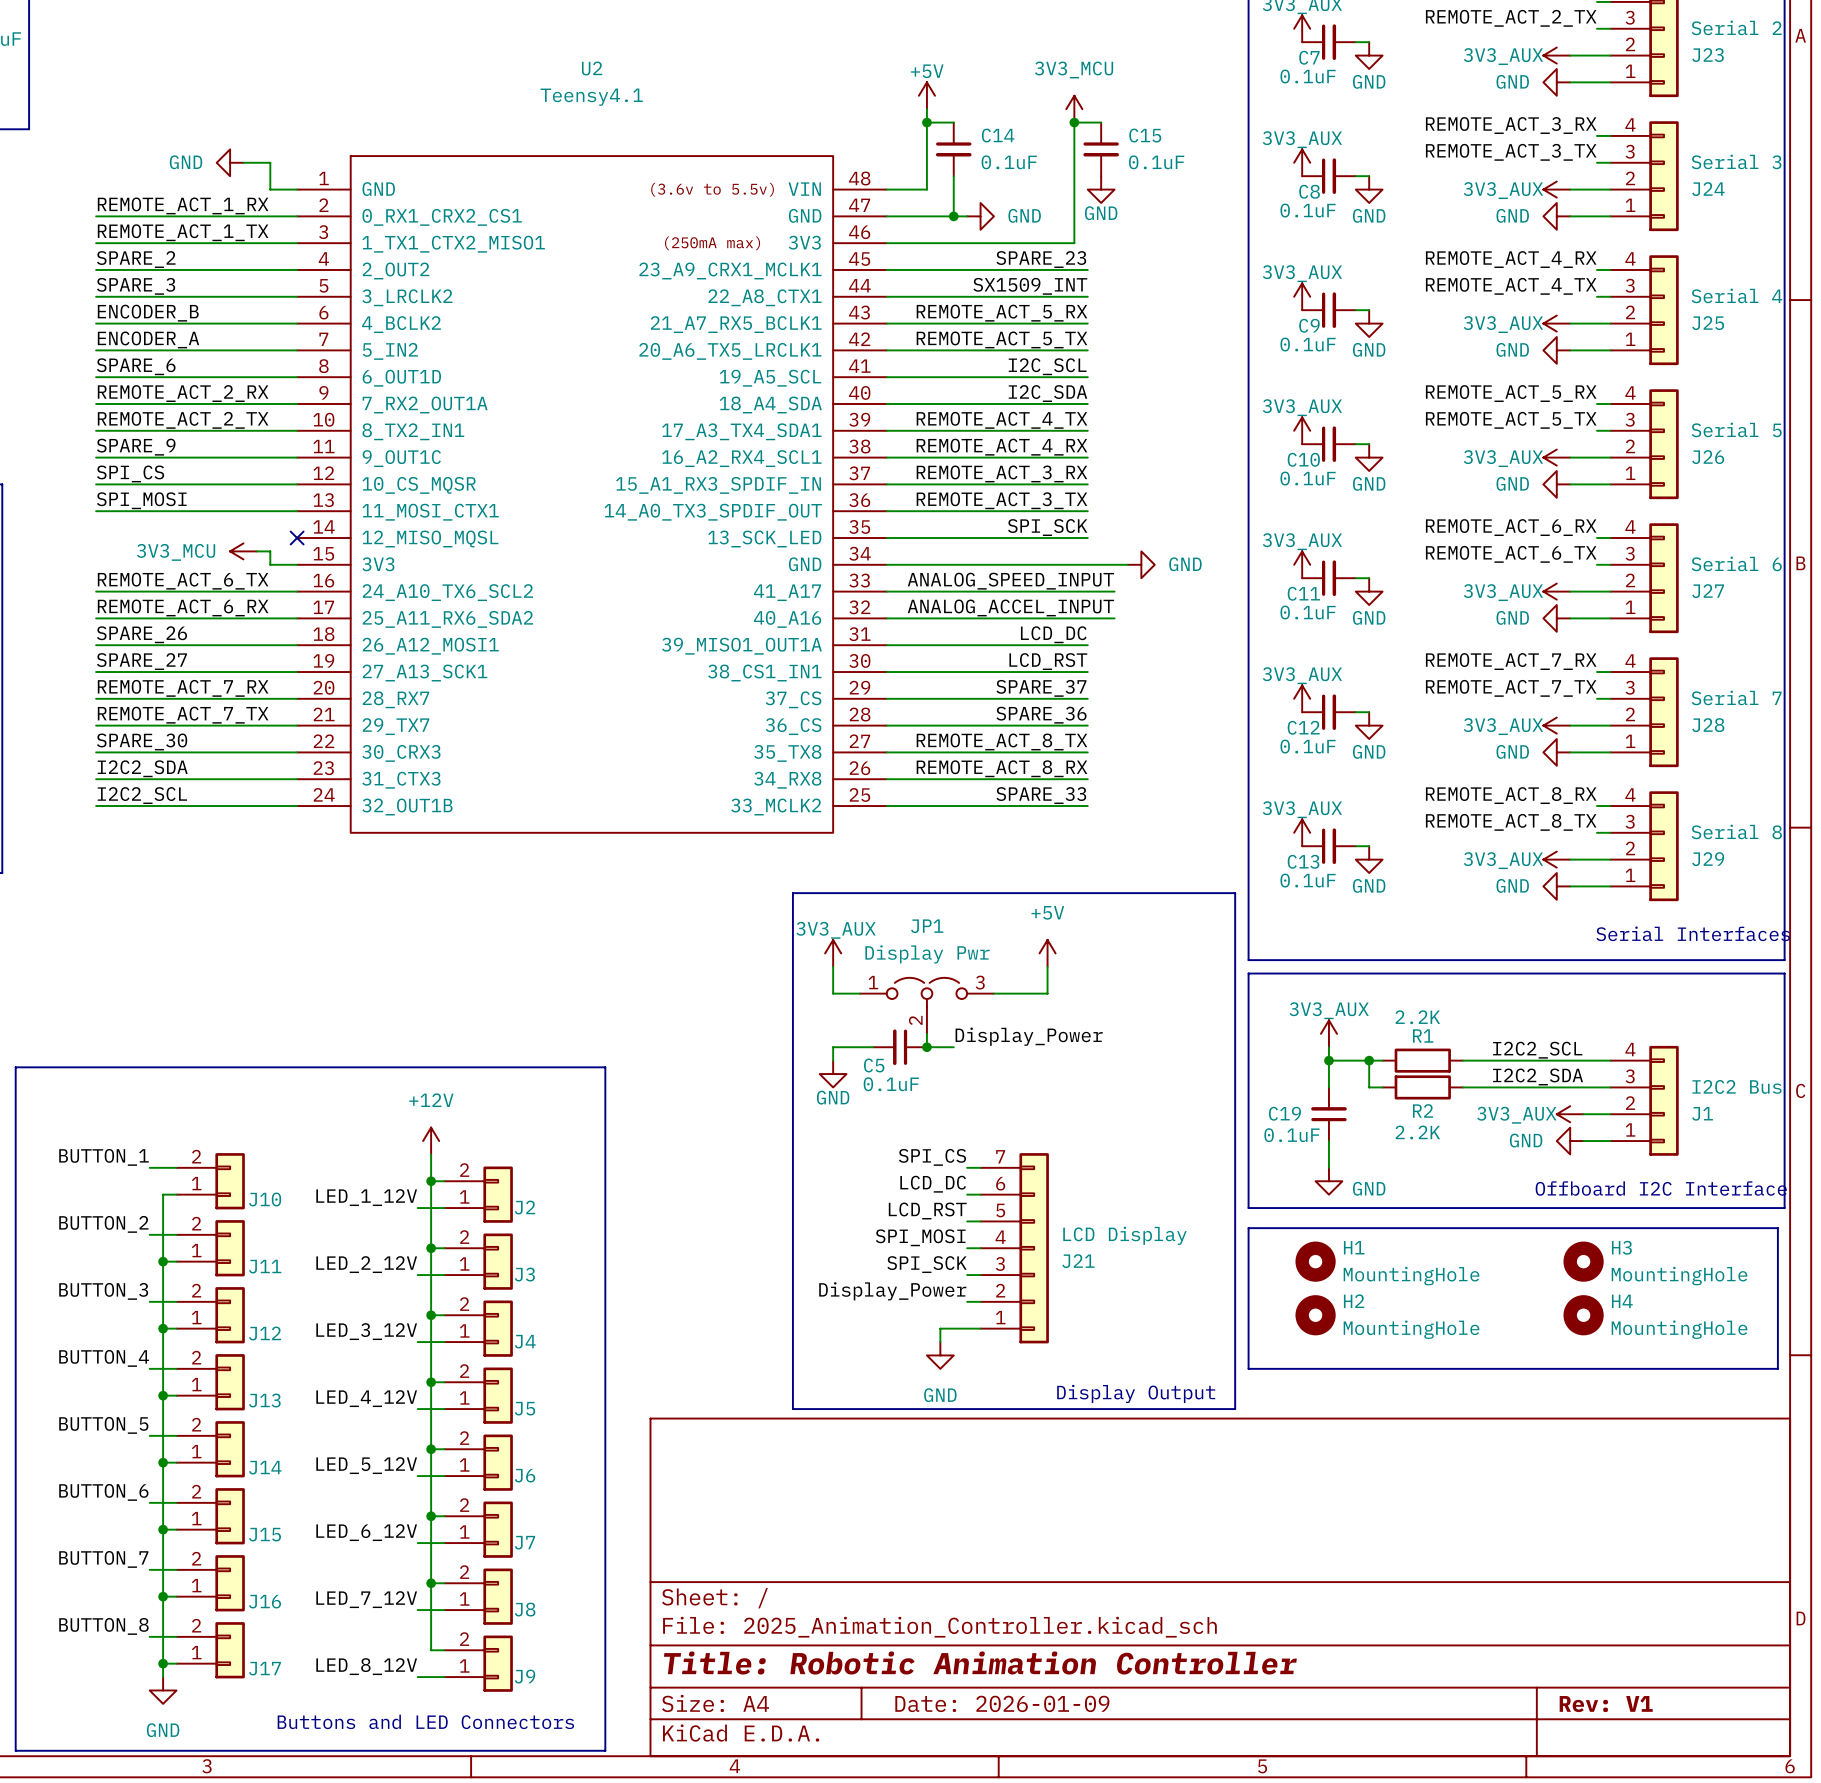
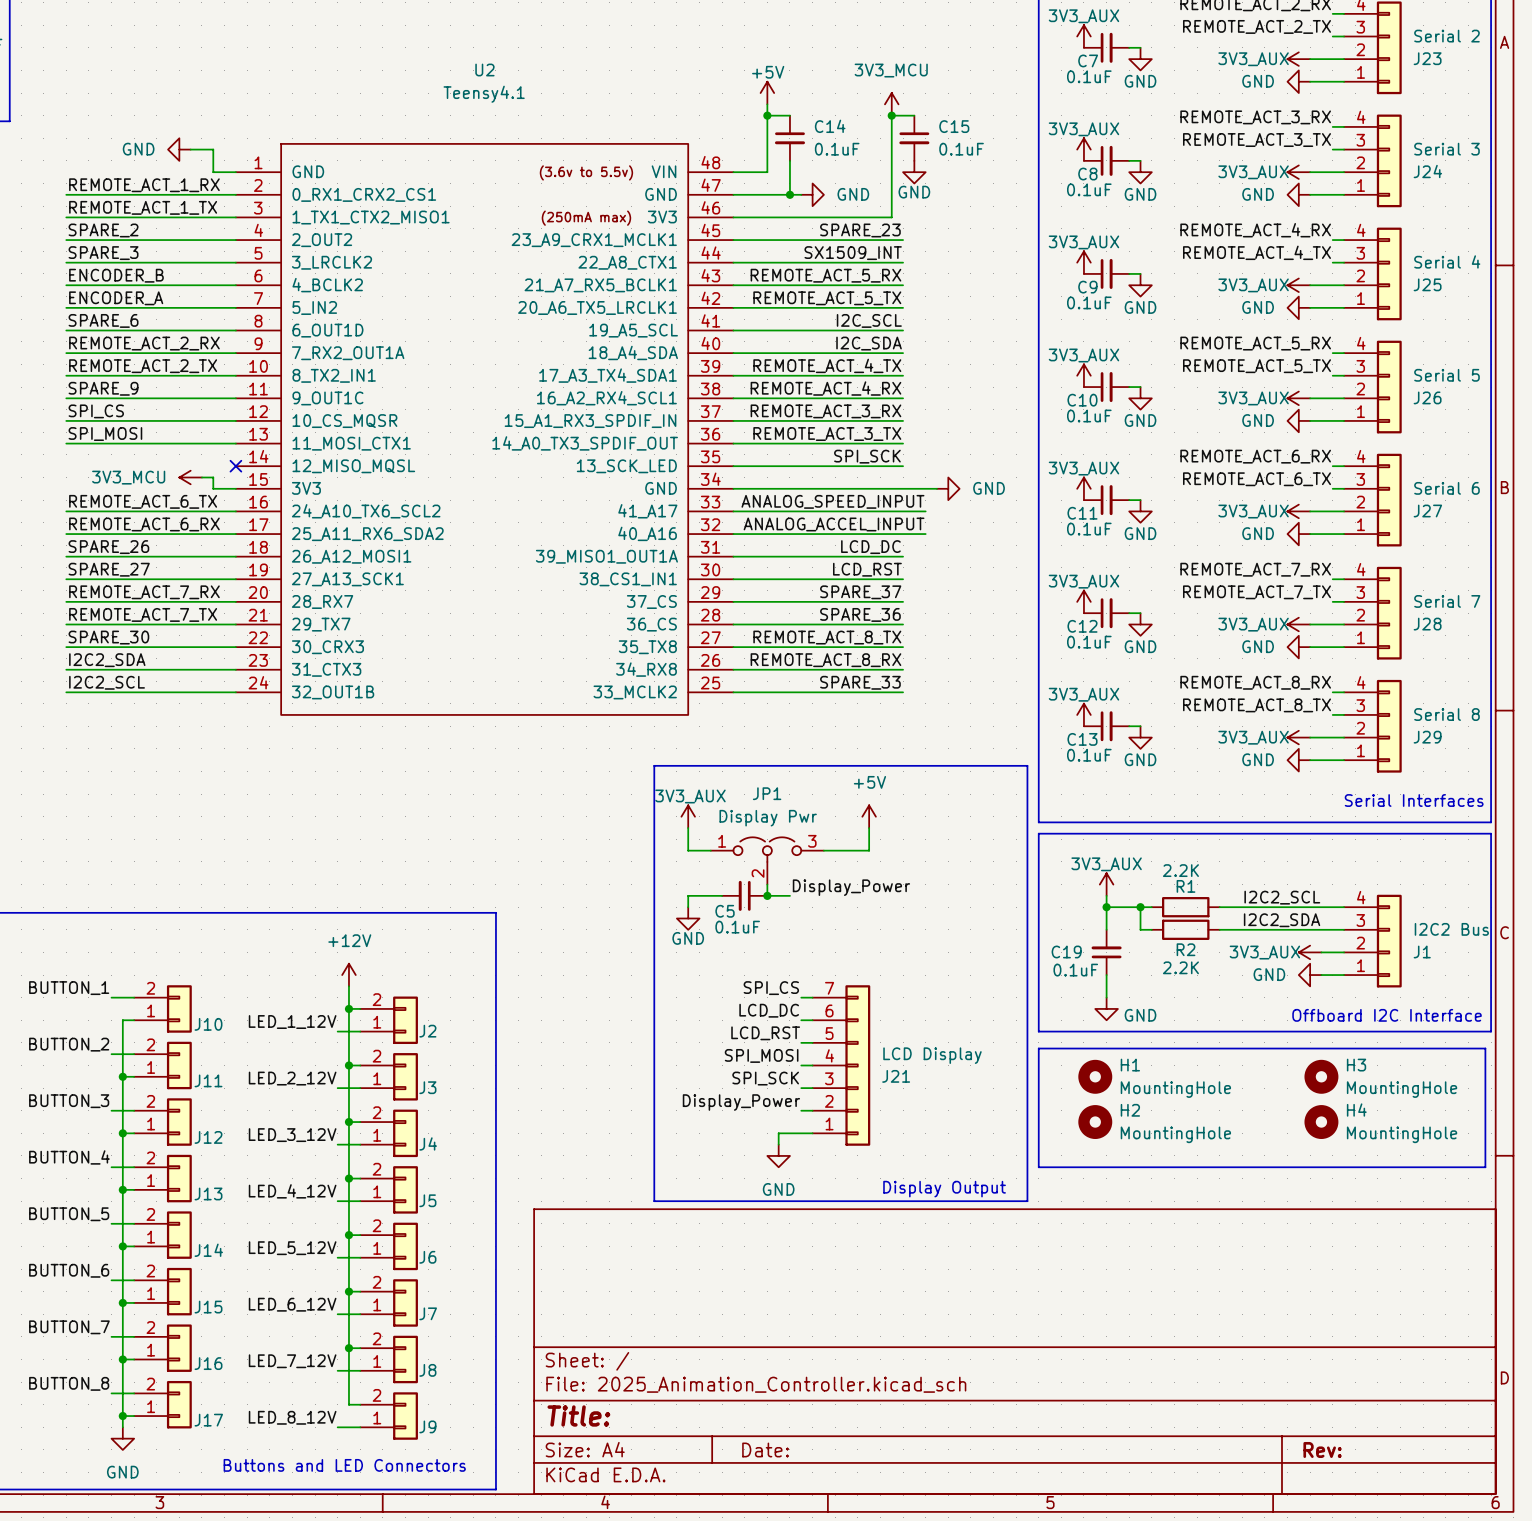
title block: Title: Robotic Animation Controller (980, 1663) -> Title: (578, 1415)
title block: Date: 2026-01-09 (1002, 1703) -> Date: (765, 1449)
title block: Rev: V1 (1606, 1704) -> Rev: (1322, 1449)

